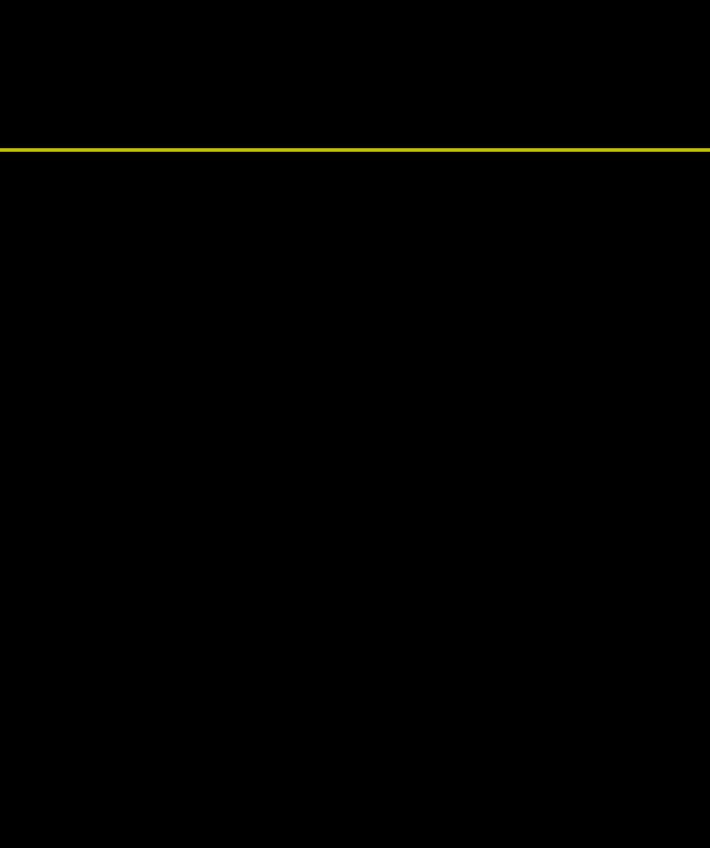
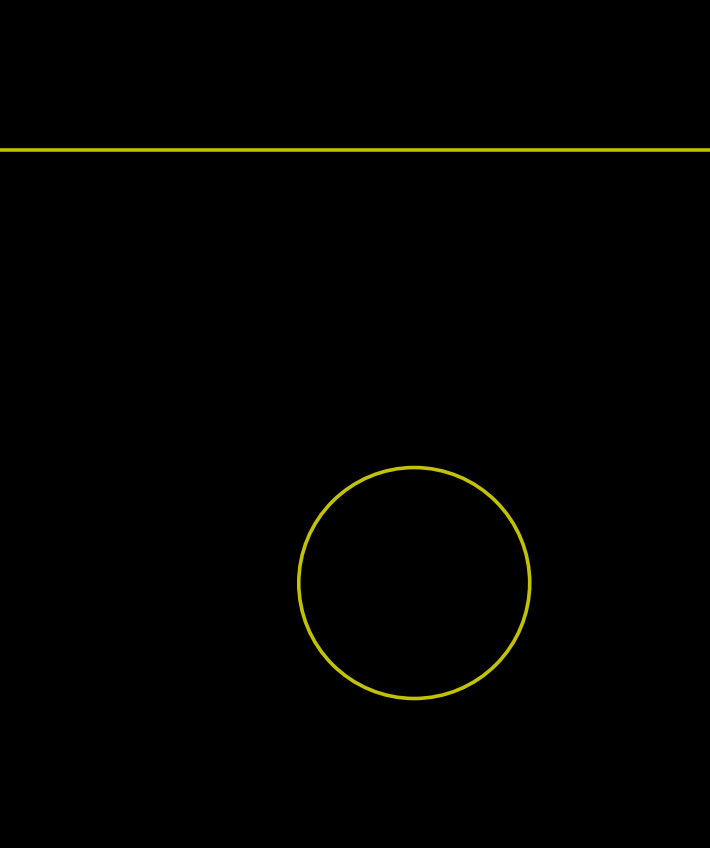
round board edge: none -> [296, 465, 532, 701]

